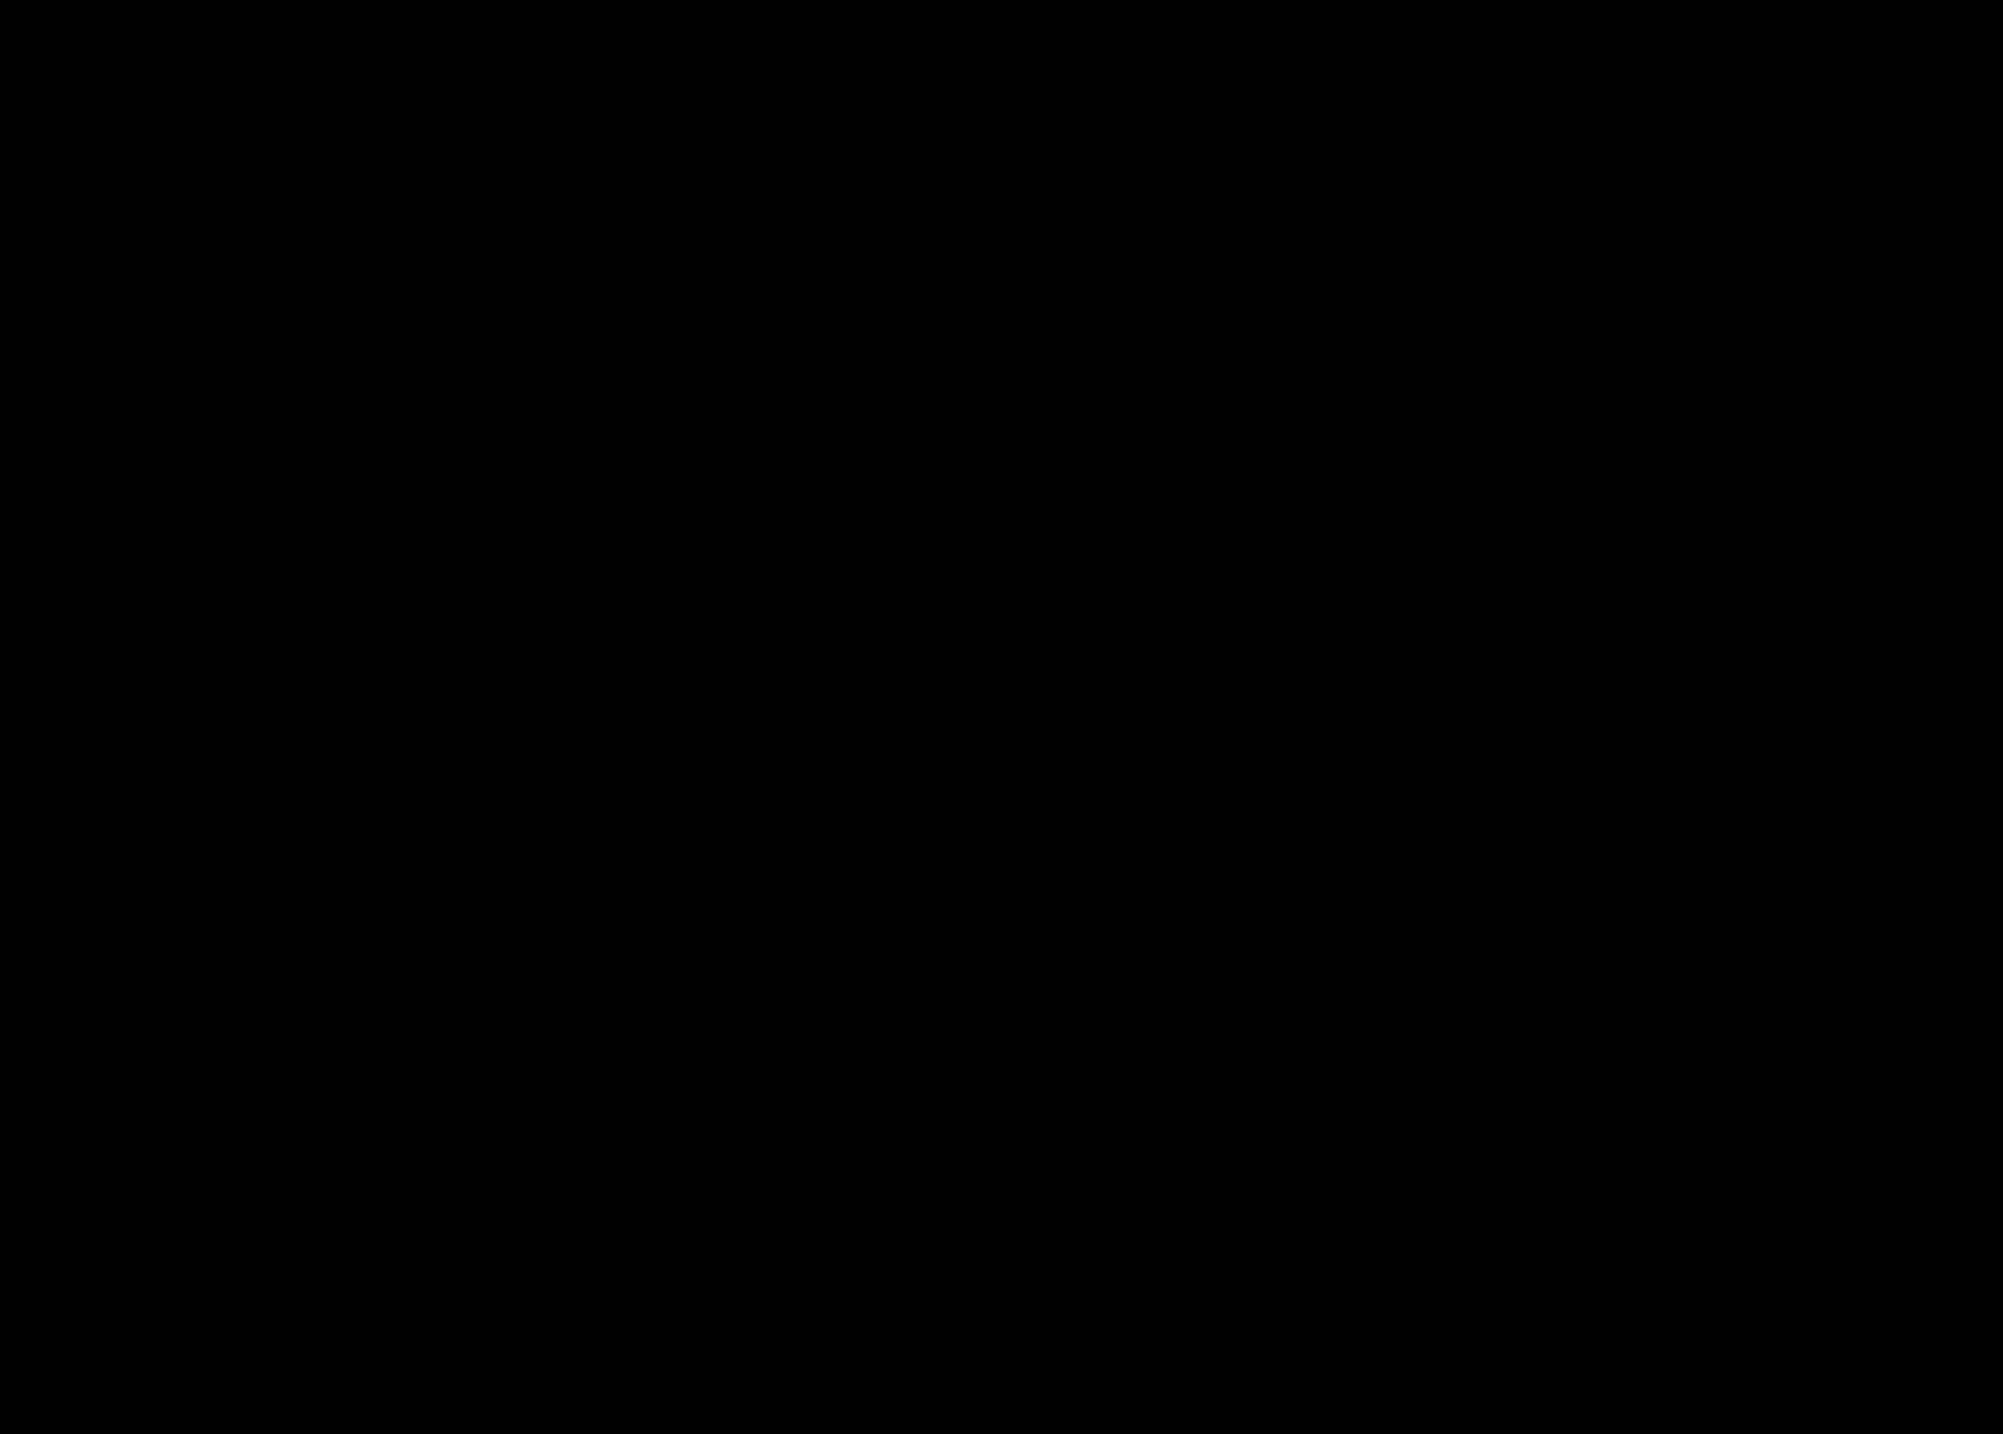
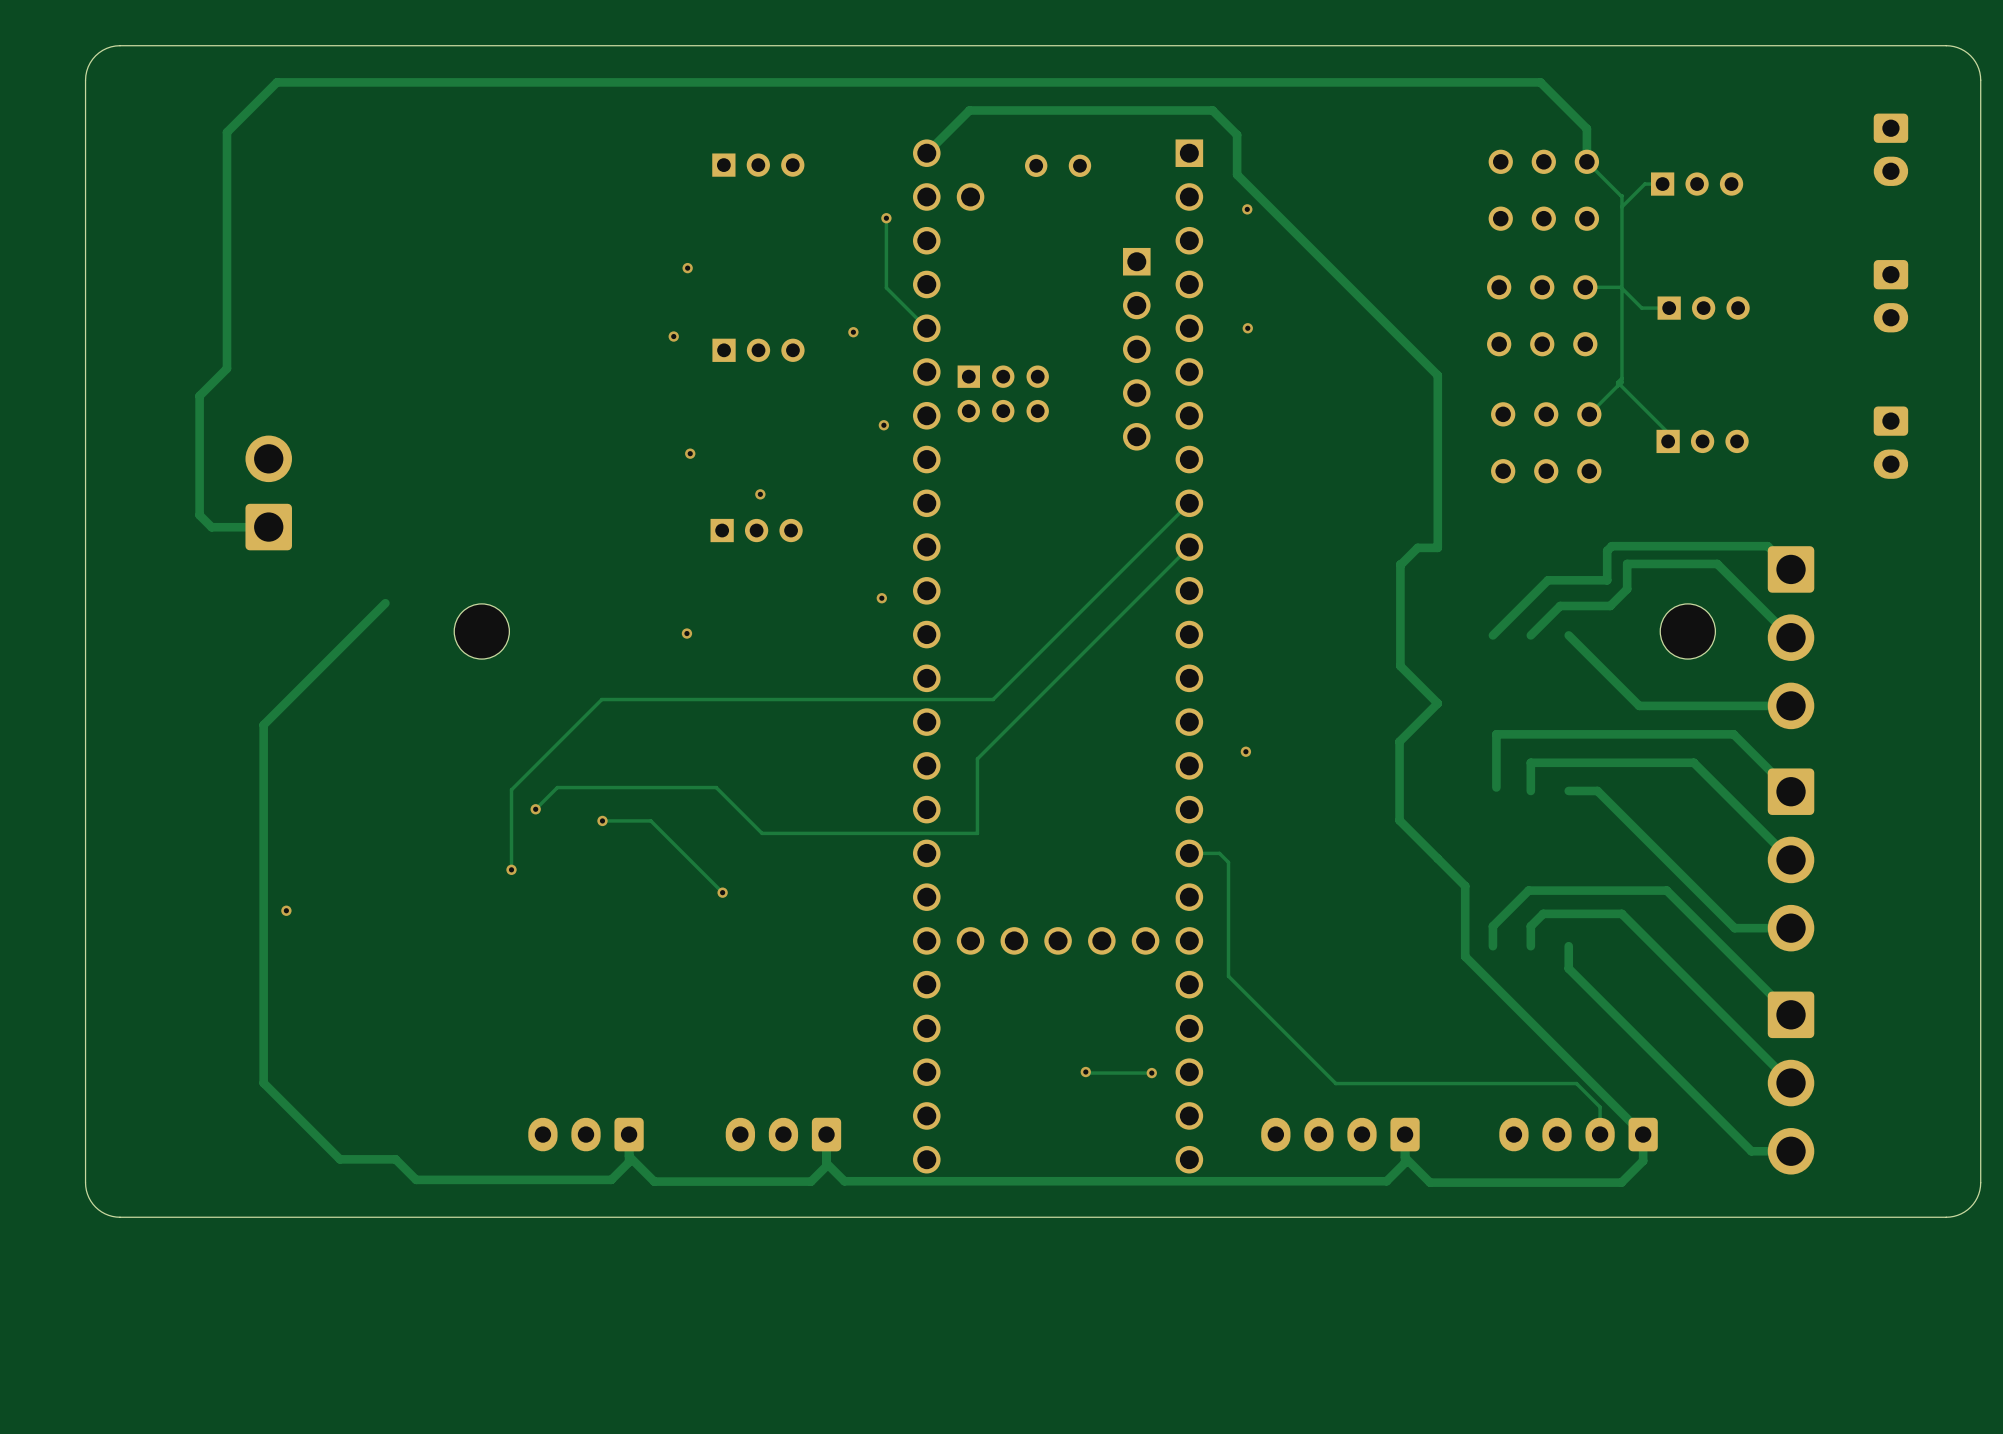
board edge: none -> (1946, 45) (120, 45) (102, 50) (90, 62) (85, 80) (85, 1182) (90, 1201) (105, 1213) (120, 1217) (1946, 1217) (1964, 1211) (1975, 1201) (1980, 1182) (1980, 80) (1977, 65) (1970, 55) (1957, 47) (1946, 45)
part: none -> (1890, 149)
track: none -> (926, 153) (969, 110) (1212, 110) (1237, 134) (1237, 174) (1437, 375) (1437, 547) (1417, 547) (1400, 564) (1400, 666) (1437, 703) (1399, 741) (1399, 820) (1465, 886) (1465, 956) (1643, 1134) (1643, 1160) (1621, 1182) (1430, 1182) (1405, 1157)
part: none -> (758, 165)
track: none -> (1662, 184) (1644, 184) (1621, 206)
part: none -> (1697, 184)
part: none -> (1543, 190)
via: none -> (1247, 209)
track: none -> (886, 218) (886, 287) (926, 328)
via: none -> (886, 218)
via: none -> (687, 268)
track: none -> (1585, 287) (1621, 287) (1641, 308) (1669, 308)
part: none -> (1890, 296)
part: none -> (1703, 308)
part: none -> (1542, 315)
via: none -> (1247, 328)
via: none -> (853, 332)
via: none -> (673, 336)
part: none -> (758, 350)
track: none -> (1621, 378) (1617, 382) (1617, 386) (1589, 414)
via: none -> (883, 425)
track: none -> (1668, 432) (1619, 384) (1621, 382) (1621, 195) (1586, 161) (1586, 128) (1540, 82) (276, 82) (226, 132) (226, 368) (199, 395) (199, 515) (211, 527) (268, 527)
part: none -> (1702, 441)
part: none -> (1546, 442)
part: none -> (1890, 442)
via: none -> (690, 453)
part: none -> (268, 492)
via: none -> (760, 494)
track: none -> (1189, 503) (993, 699) (601, 699) (511, 789) (511, 869)
part: none -> (756, 530)
track: none -> (1189, 547) (977, 758) (977, 833) (762, 833) (716, 787) (557, 787) (535, 809)
track: none -> (1791, 569) (1767, 546) (1611, 546) (1607, 550) (1607, 580) (1548, 580) (1492, 635)
via: none -> (881, 598)
track: none -> (385, 603) (263, 724) (263, 1083) (339, 1159) (395, 1159) (416, 1179) (611, 1179) (629, 1162) (629, 1134)
part: none -> (481, 631)
part: none -> (1687, 631)
via: none -> (686, 633)
track: none -> (1530, 635) (1560, 605) (1610, 605) (1627, 589) (1627, 563) (1717, 563) (1791, 637)
track: none -> (1568, 635) (1639, 705) (1791, 705)
part: none -> (1791, 637)
part: none -> (1058, 656)
via: none -> (1245, 751)
track: none -> (1496, 787) (1496, 734) (1733, 734) (1791, 791)
track: none -> (1530, 790) (1530, 762) (1693, 762) (1791, 859)
track: none -> (1568, 790) (1597, 790) (1734, 928) (1791, 928)
via: none -> (535, 809)
track: none -> (602, 820) (650, 820) (722, 892)
via: none -> (602, 820)
track: none -> (1189, 853) (1219, 853) (1228, 862) (1228, 976) (1335, 1083) (1576, 1083) (1600, 1107) (1600, 1134)
part: none -> (1791, 859)
via: none -> (511, 869)
via: none -> (722, 892)
via: none -> (286, 910)
track: none -> (1492, 946) (1492, 926) (1528, 890) (1666, 890) (1791, 1014)
track: none -> (1530, 946) (1530, 926) (1543, 913) (1621, 913) (1791, 1083)
track: none -> (1568, 946) (1568, 968) (1751, 1151) (1791, 1151)
track: none -> (1085, 1072) (1151, 1073)
via: none -> (1085, 1072)
via: none -> (1151, 1073)
part: none -> (1791, 1083)
part: none -> (586, 1134)
part: none -> (783, 1134)
track: none -> (826, 1134) (826, 1166) (811, 1181) (654, 1181) (629, 1156)
part: none -> (1340, 1134)
track: none -> (1405, 1134) (1405, 1162) (1386, 1181) (844, 1181) (826, 1163)
part: none -> (1578, 1134)

